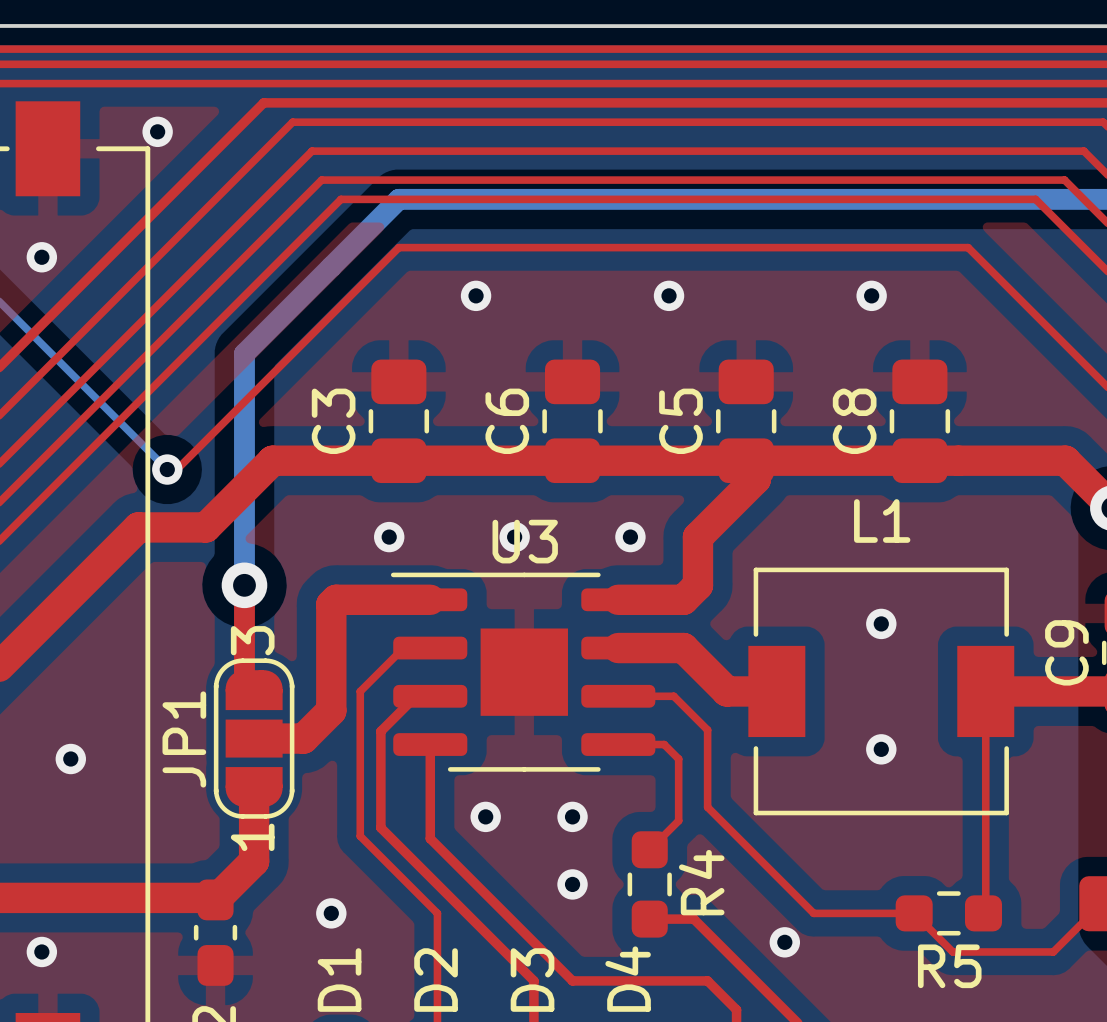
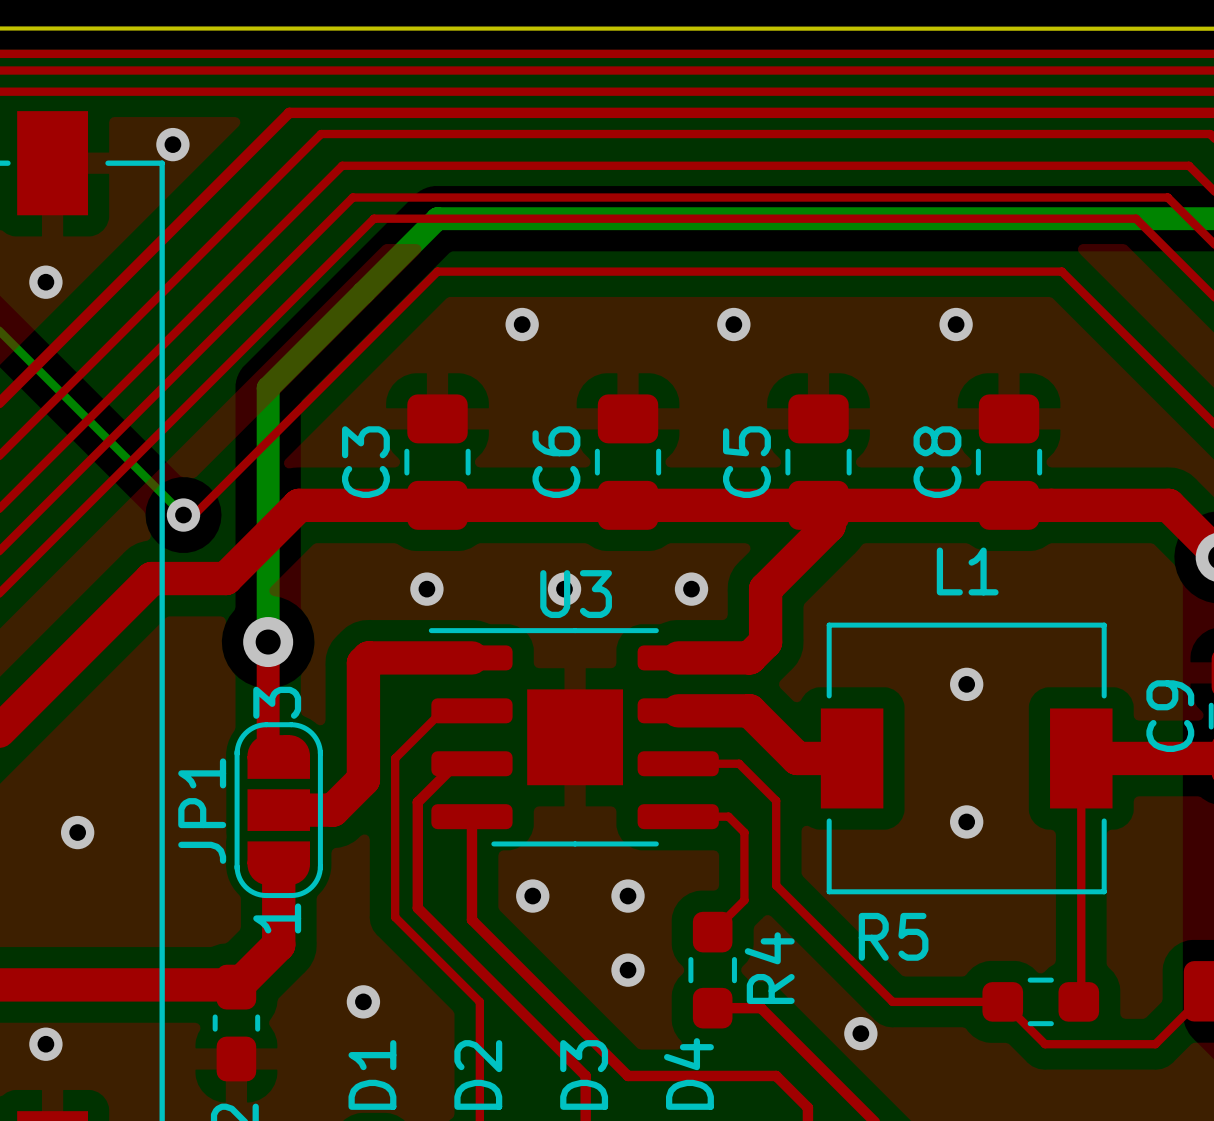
R5 name position: R5 (949, 966) -> R5 (893, 936)

